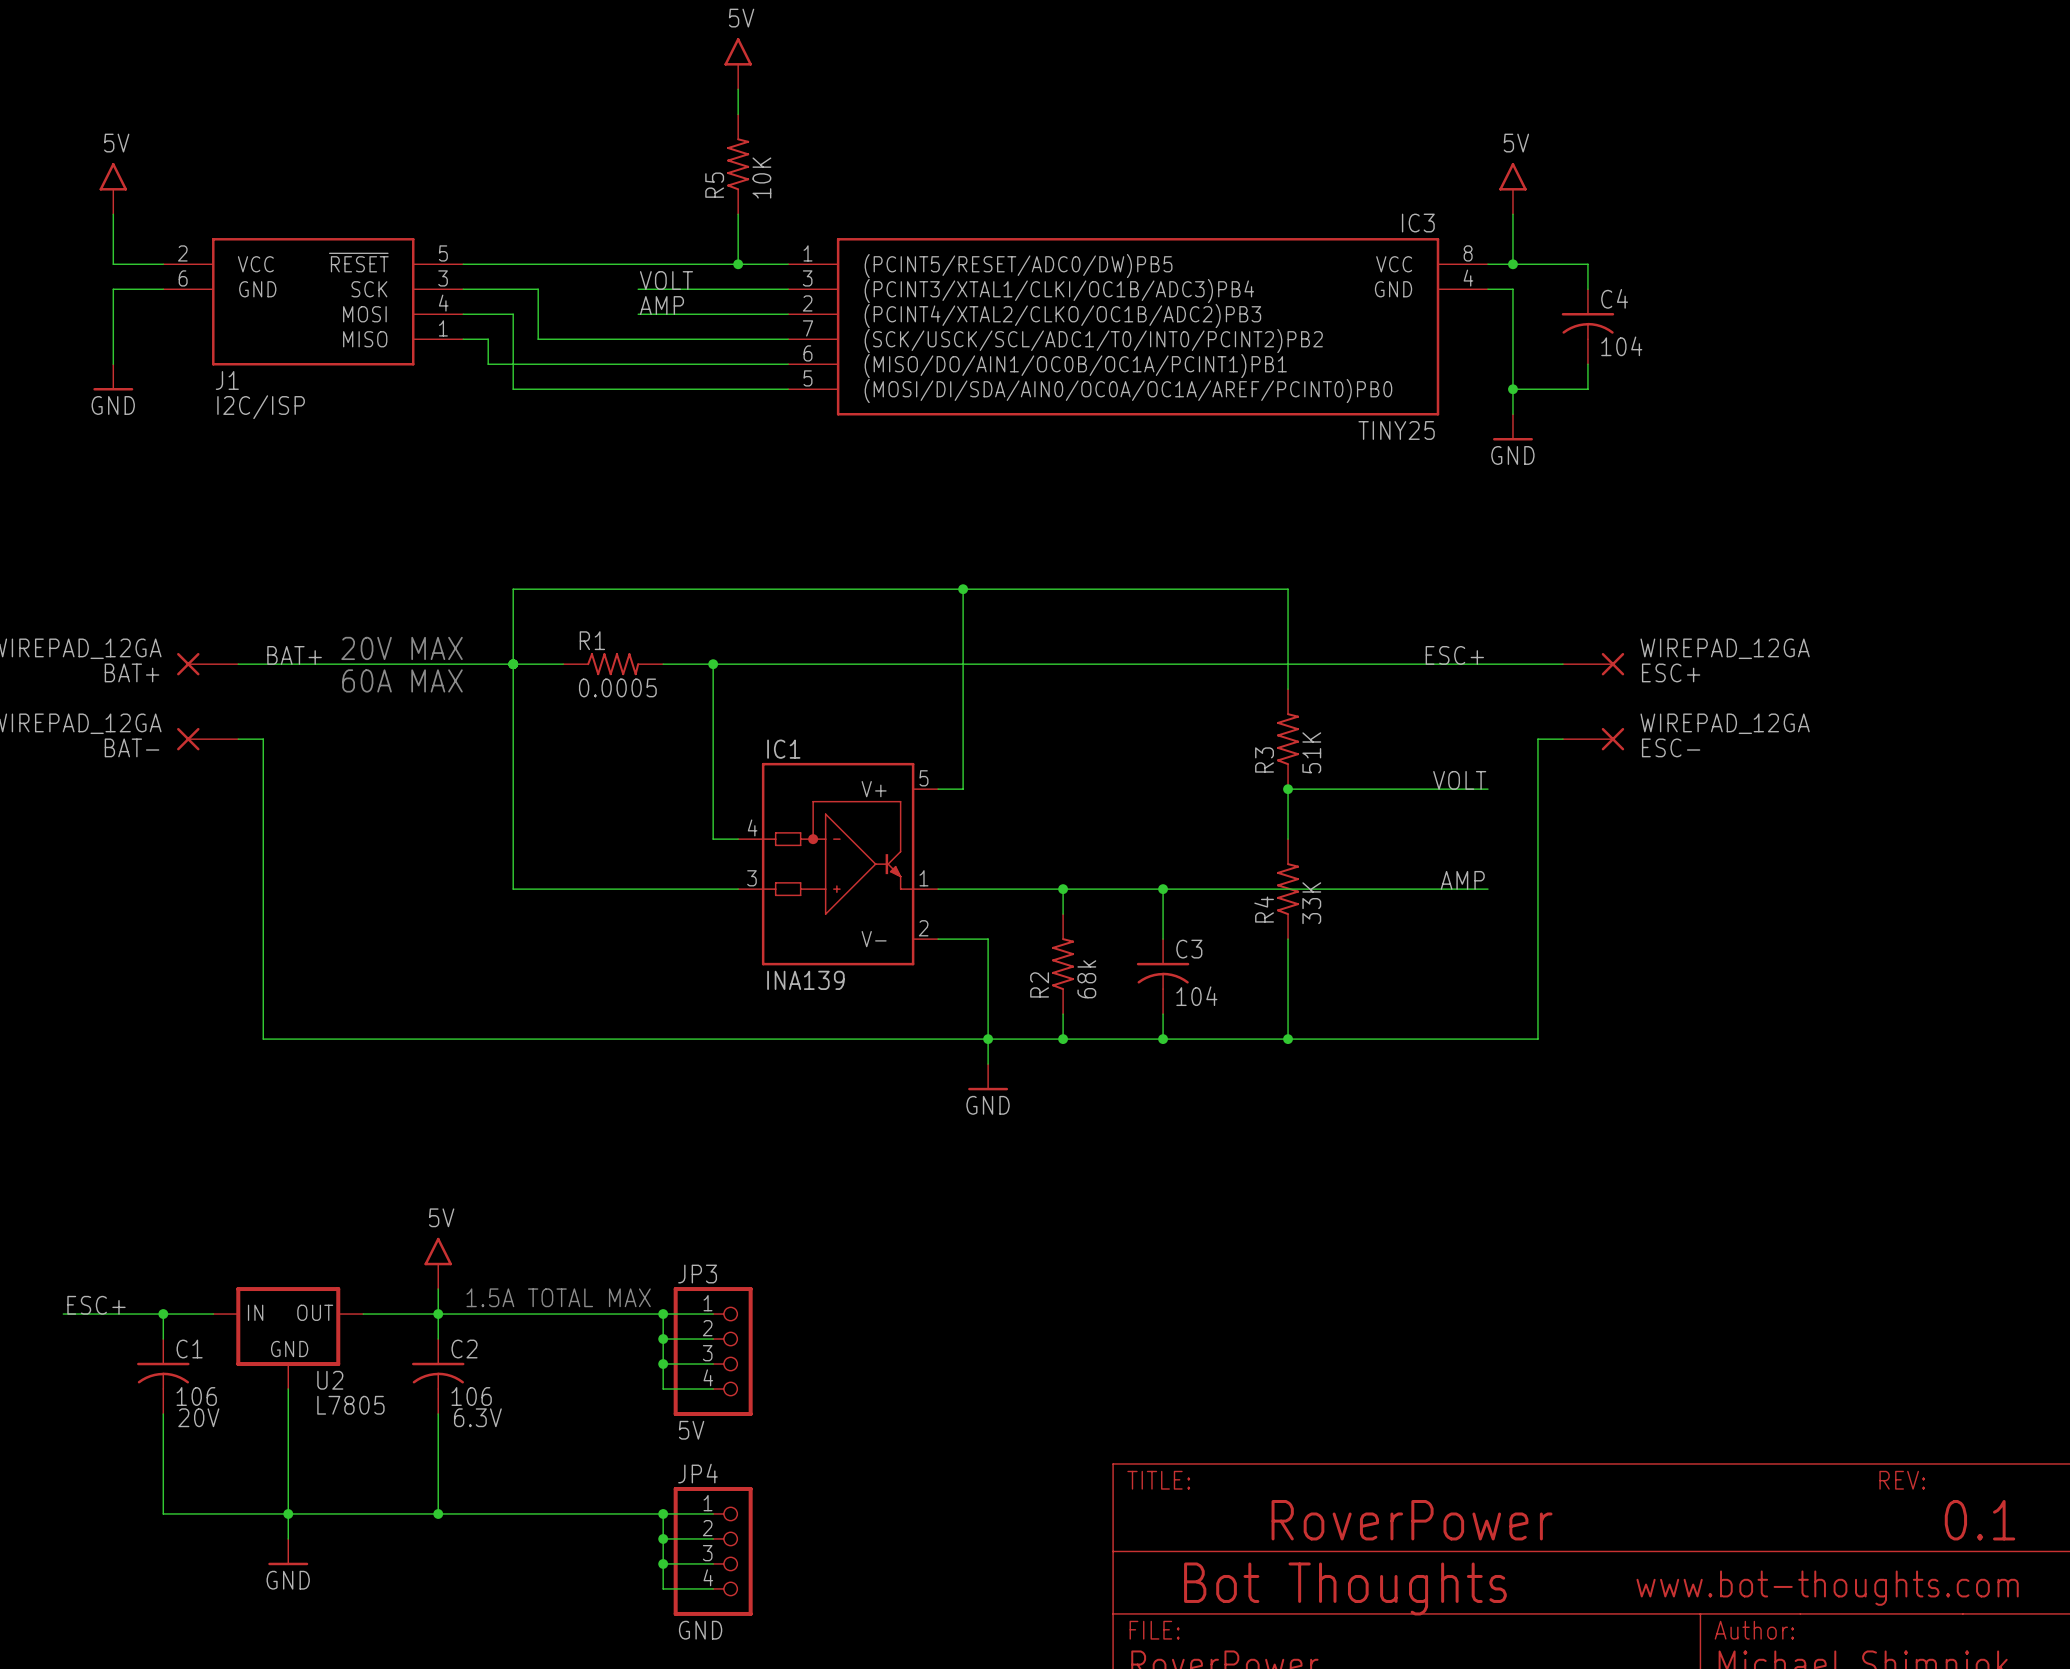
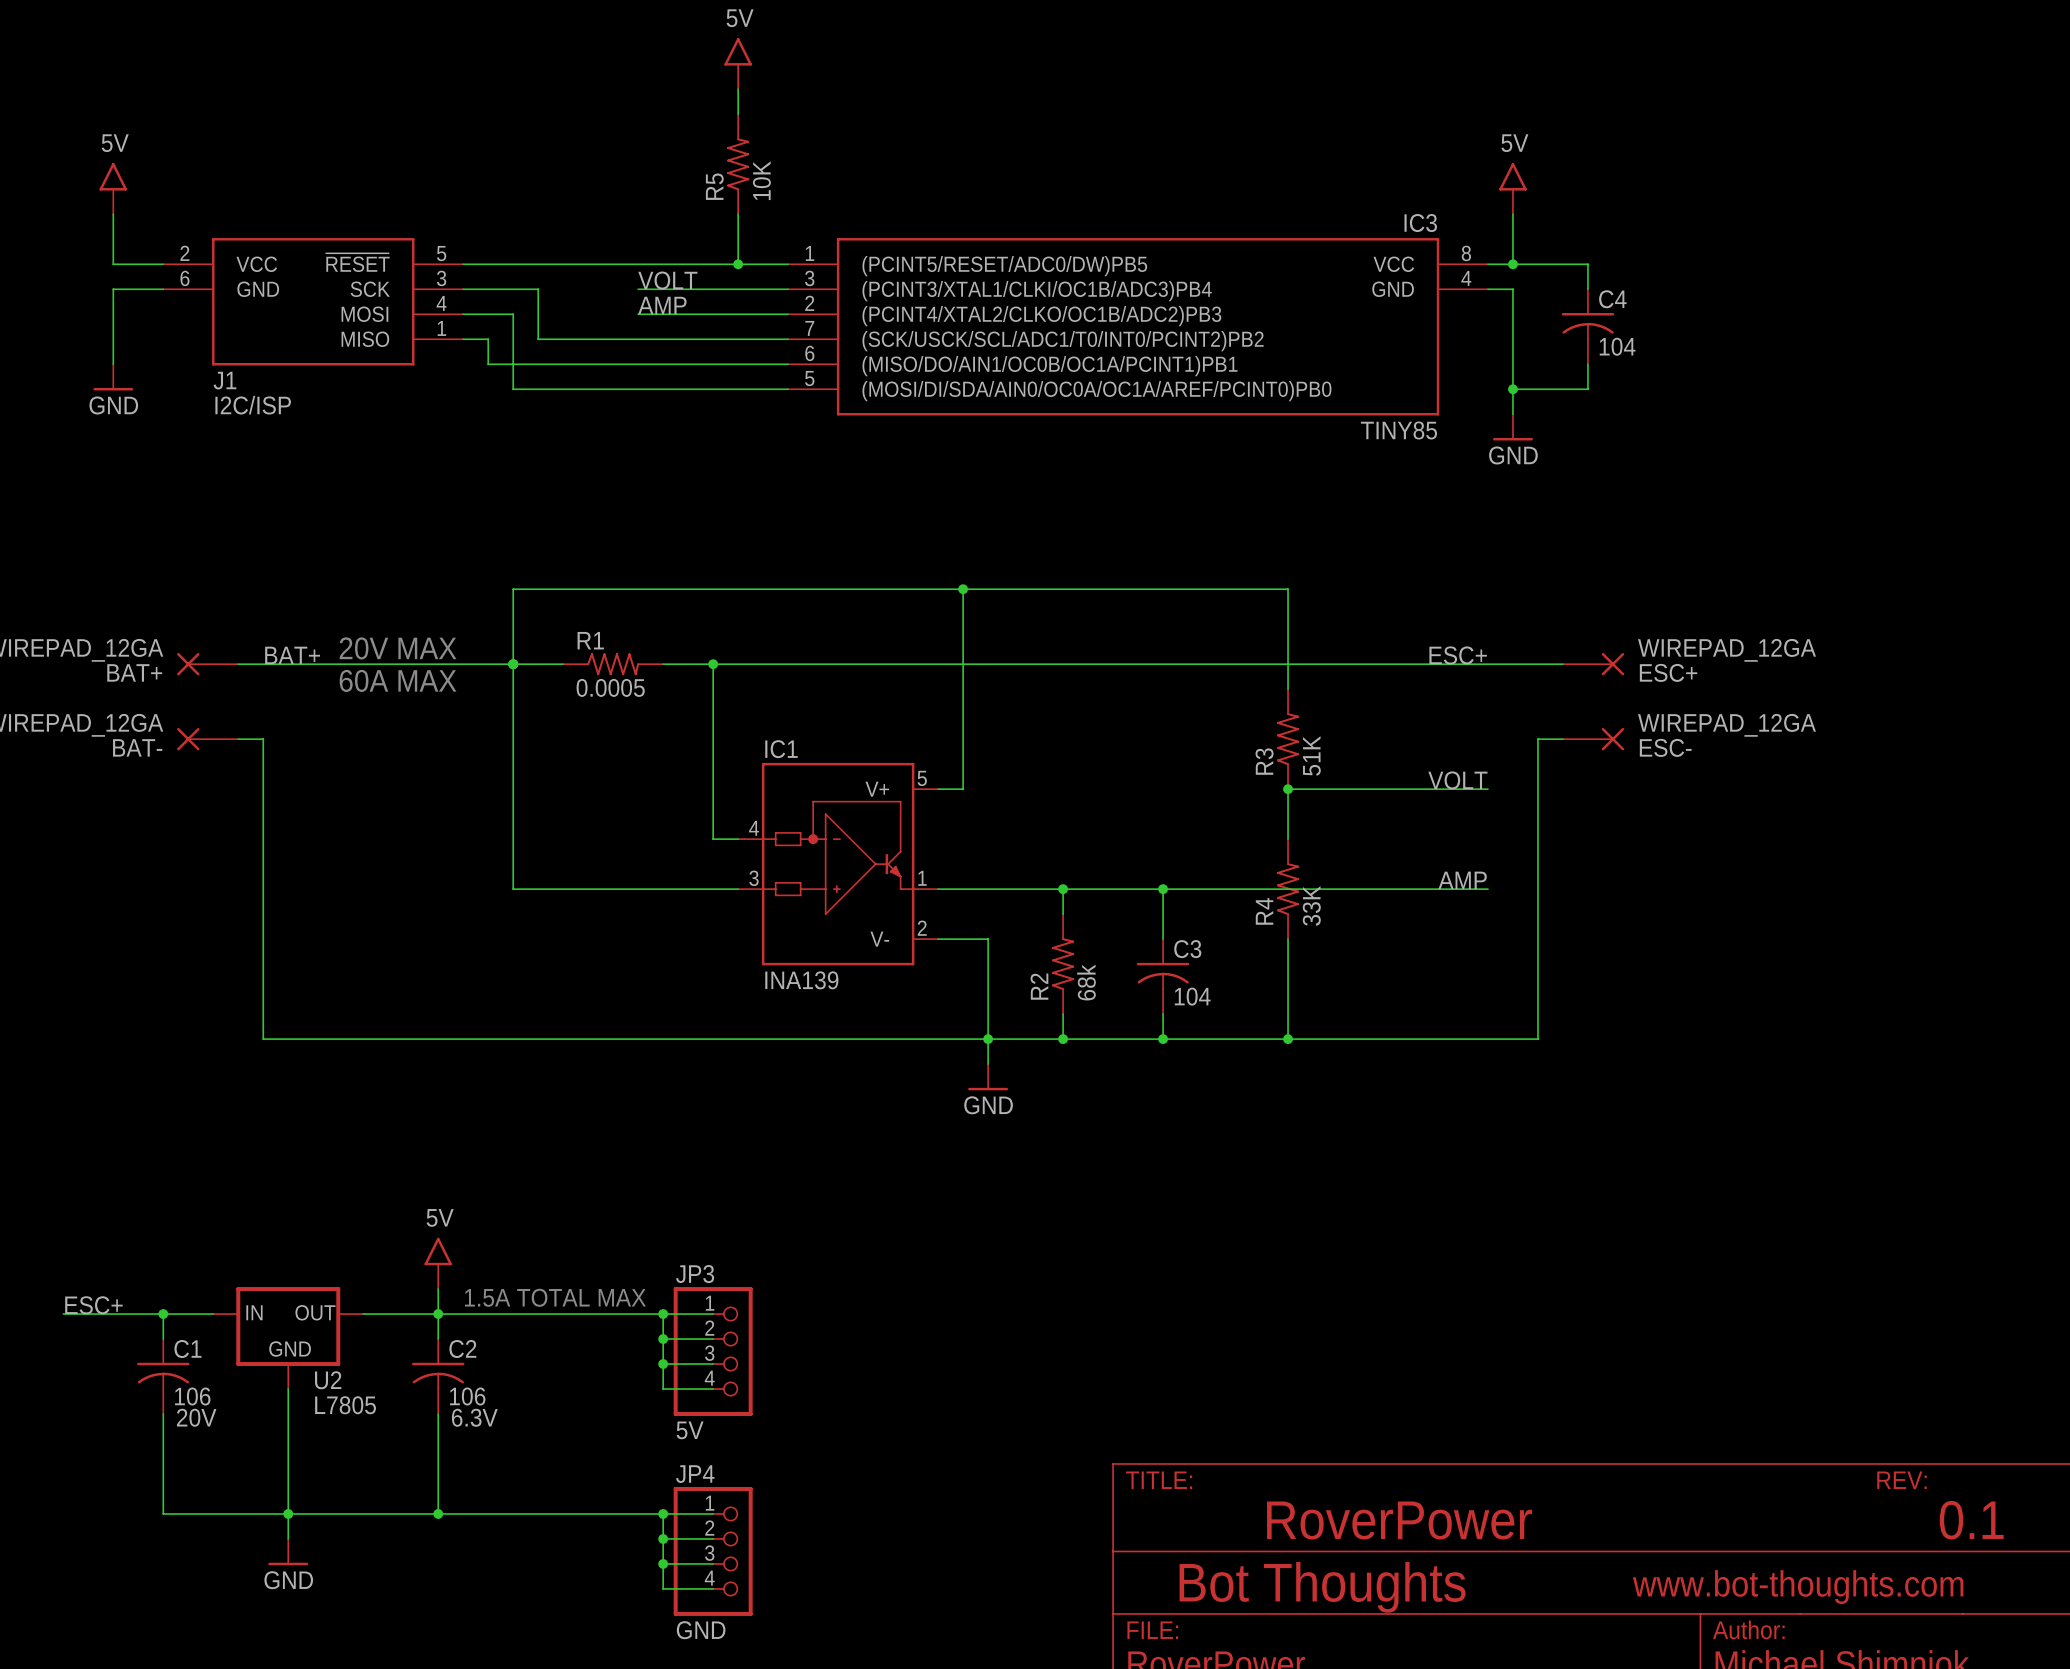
IC3 value: TINY25 (1396, 430) -> TINY85 (1398, 430)

